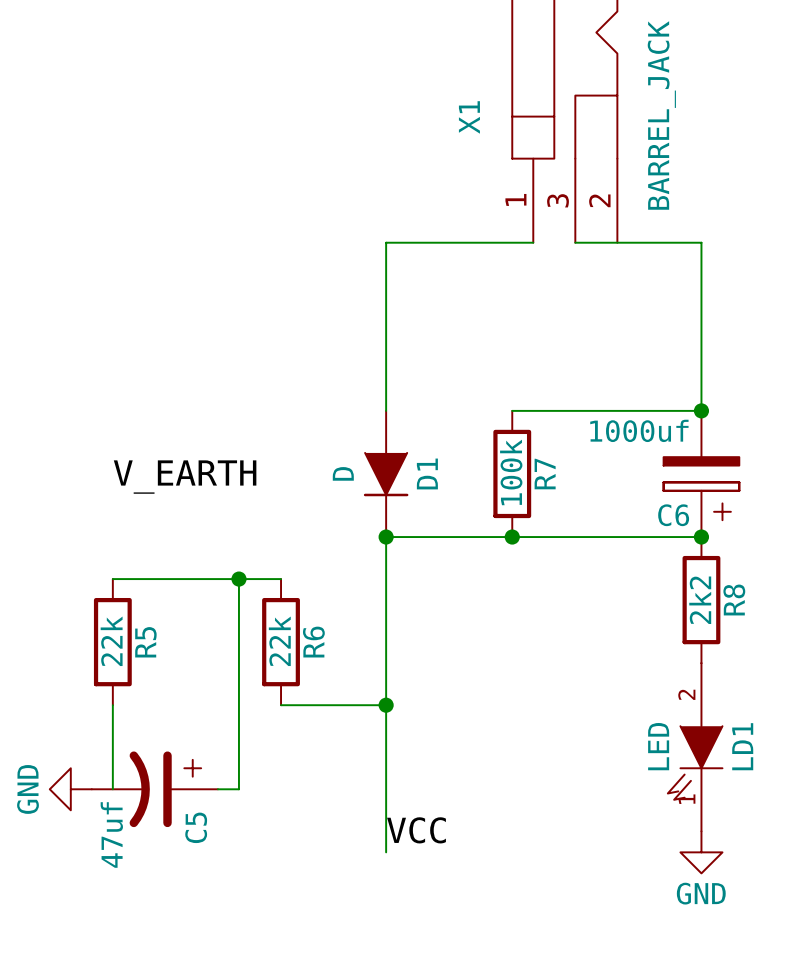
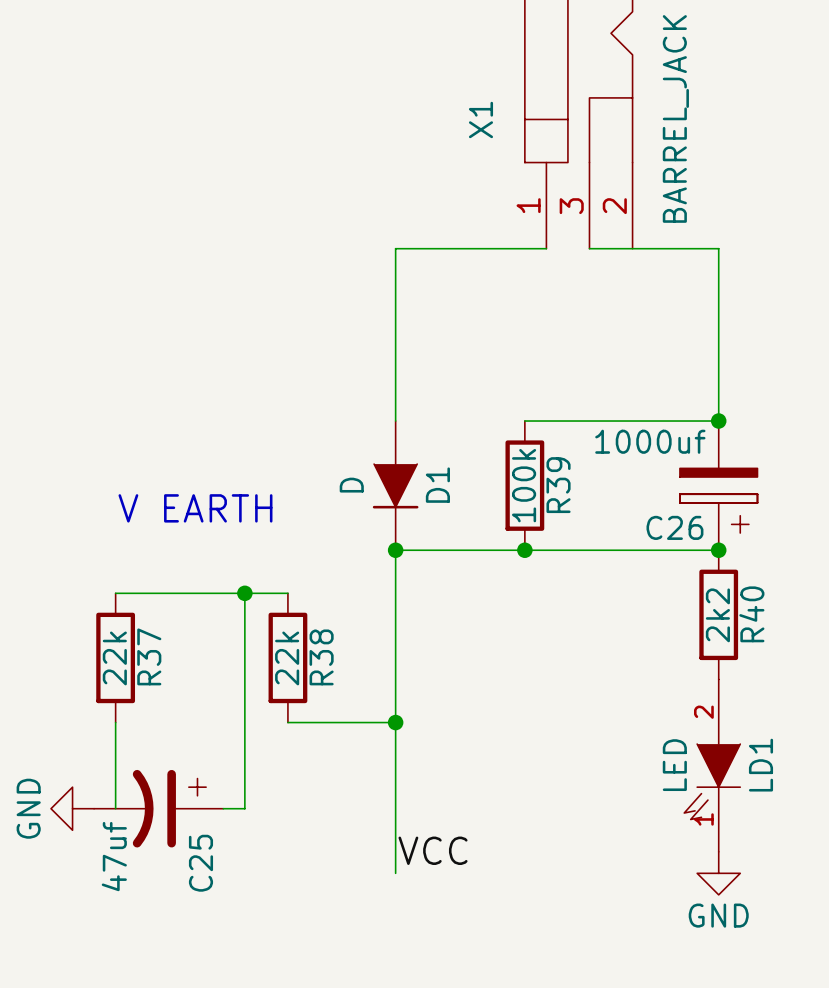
R7 name: R7 (545, 474) -> R39 (558, 485)
label: V_EARTH (185, 477) -> none
text: none -> V EARTH (195, 508)
C6 name: C6 (673, 515) -> C26 (674, 527)
R8 name: R8 (734, 600) -> R40 (751, 614)
R5 name: R5 (145, 642) -> R37 (149, 656)
R6 name: R6 (313, 642) -> R38 (321, 657)
C5 name: C5 (196, 827) -> C25 (200, 863)

